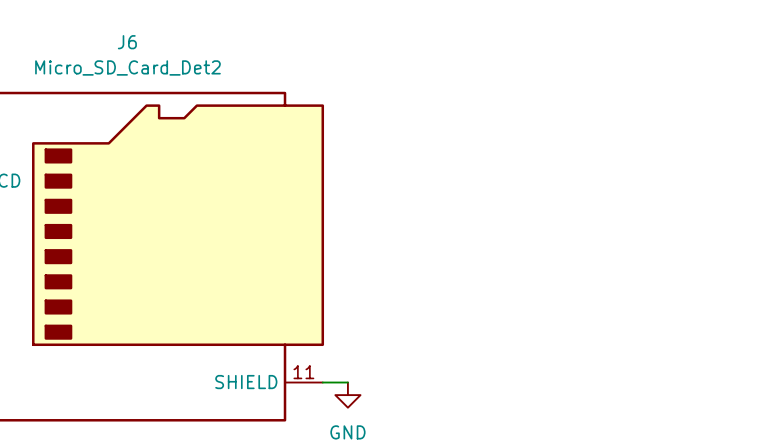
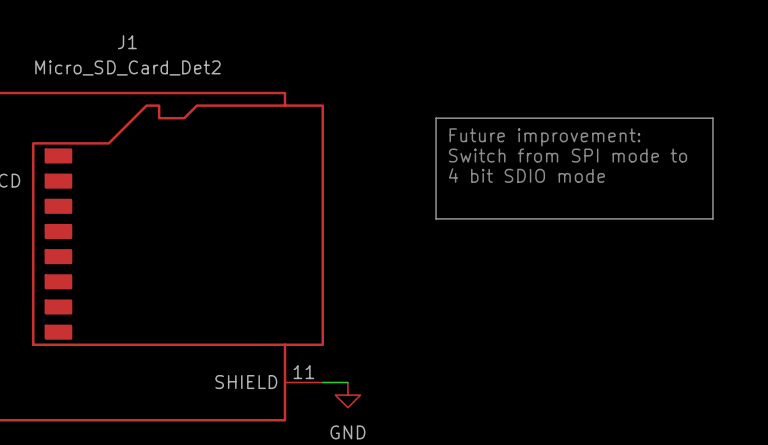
J6 name: J6 (127, 42) -> J1 (127, 42)
line: none -> (436, 118) (712, 118) (712, 218) (436, 218) (436, 118)
text: none -> Future improvement: (544, 137)
text: none -> Switch from SPI mode to (568, 155)
text: none -> 4 bit SDIO mode (526, 175)

